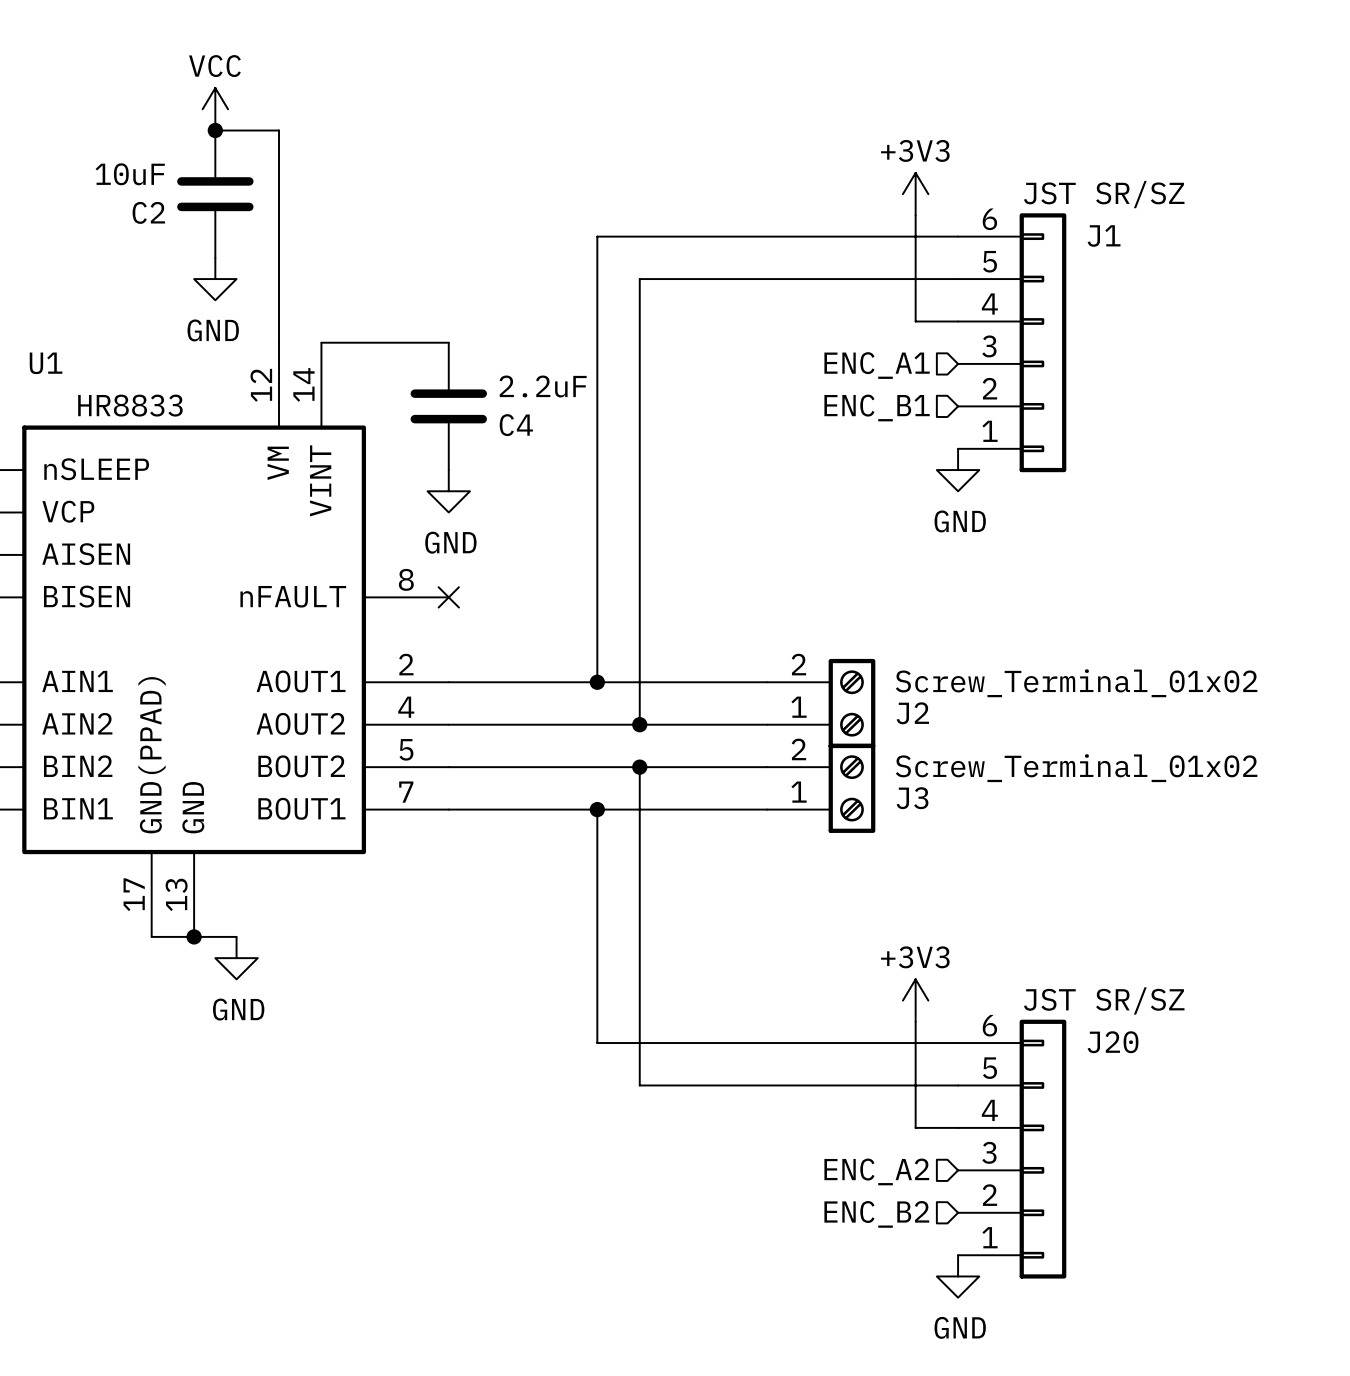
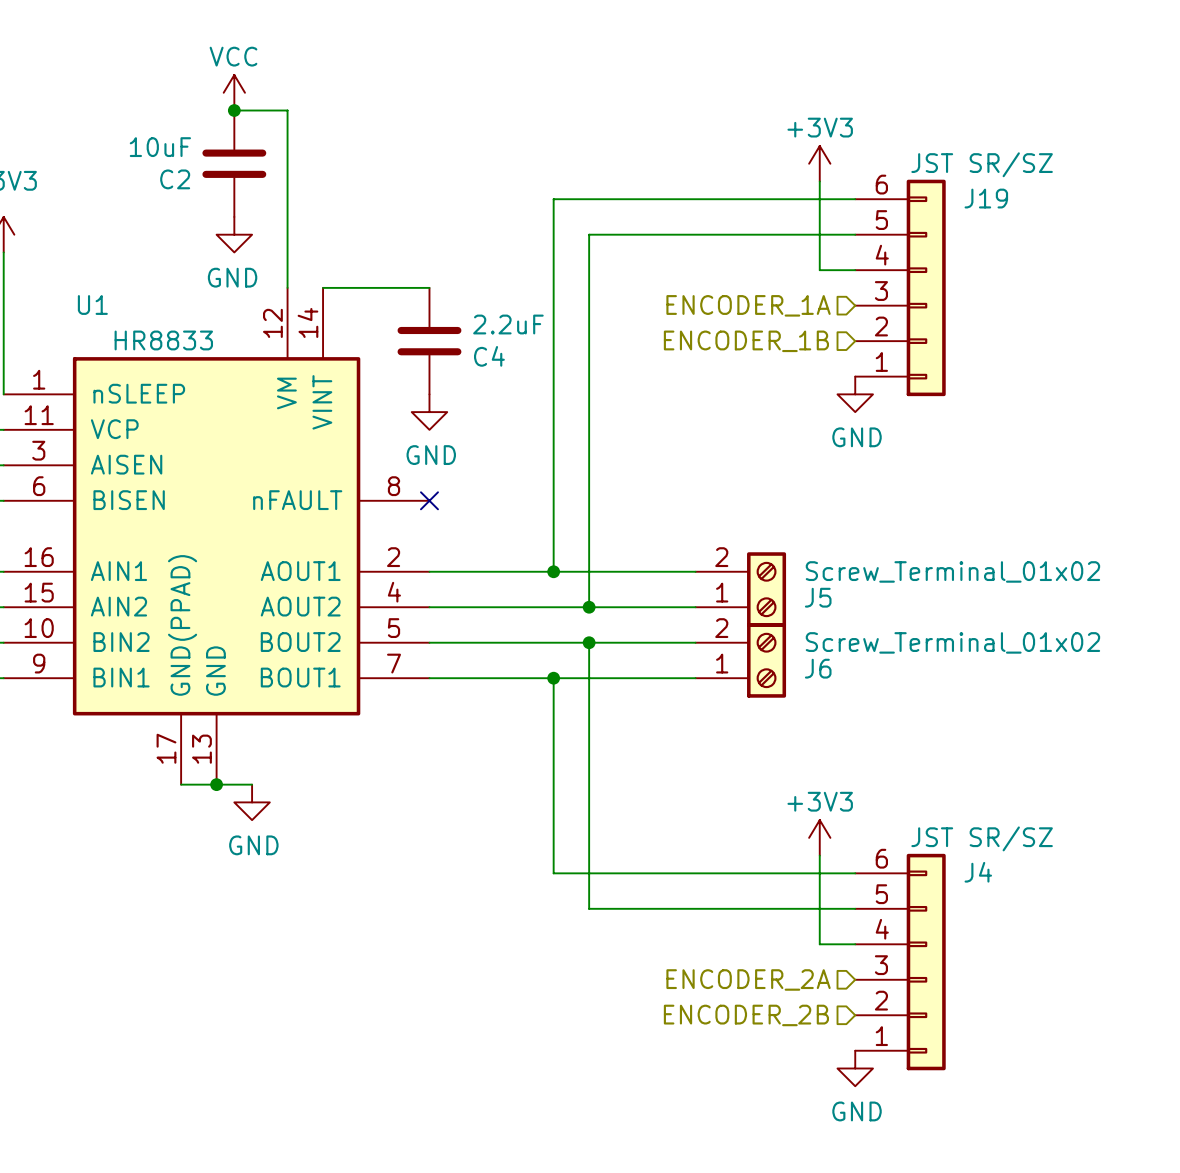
J1 name: J1 (1104, 236) -> J19 (986, 198)
hierarchical label: ENC_A1 (877, 365) -> ENCODER_1A (748, 305)
hierarchical label: ENC_B1 (877, 407) -> ENCODER_1B (746, 341)
J2 name: J2 (912, 713) -> J5 (818, 597)
J3 name: J3 (912, 798) -> J6 (818, 668)
J20 name: J20 (1113, 1042) -> J4 (978, 872)
hierarchical label: ENC_A2 (876, 1171) -> ENCODER_2A (748, 979)
hierarchical label: ENC_B2 (876, 1214) -> ENCODER_2B (746, 1015)

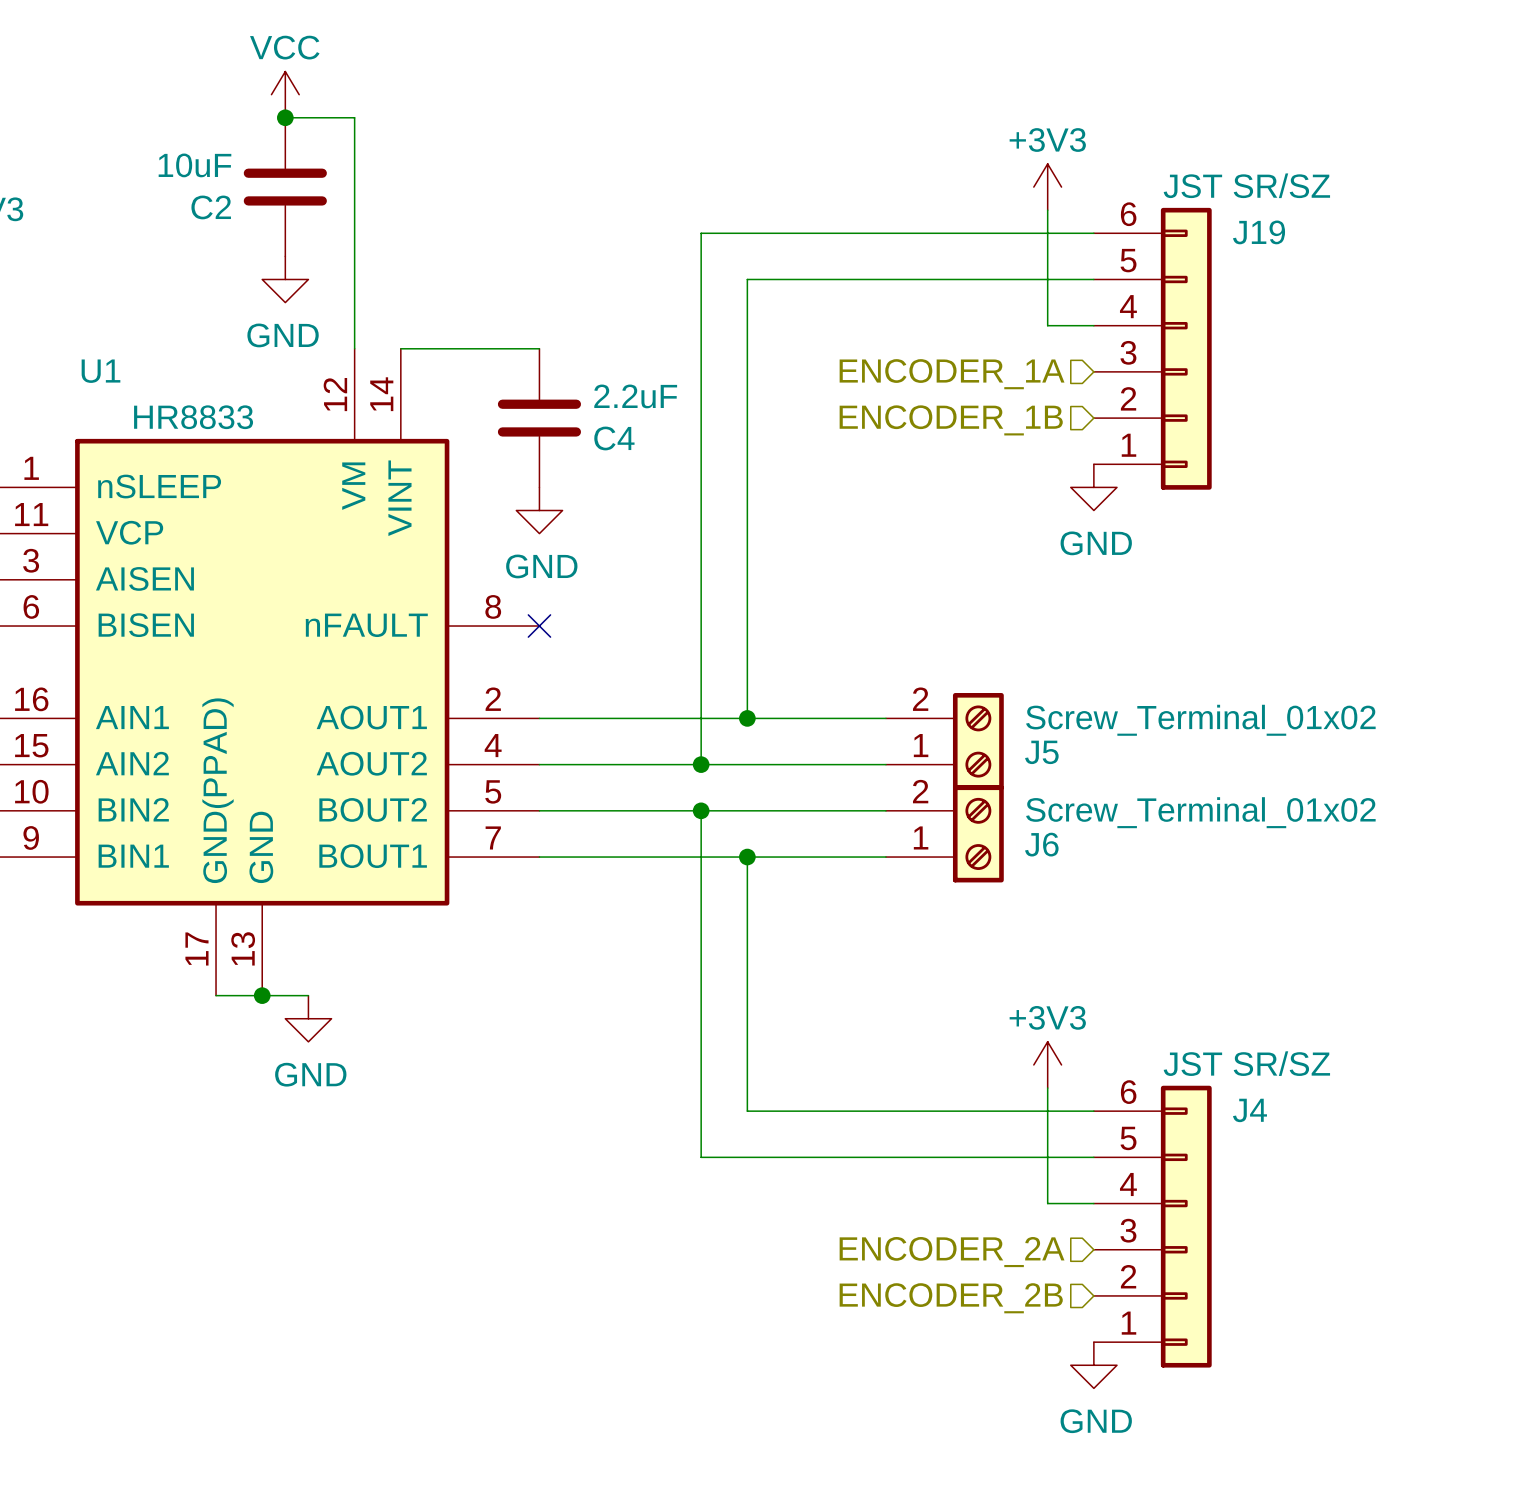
junction: (553, 571) -> none
wire: (589, 571) (589, 607) -> (701, 718) (701, 764)
junction: none -> (747, 718)
junction: none -> (701, 764)
junction: (589, 607) -> none
junction: none -> (701, 810)
wire: (589, 642) (589, 678) -> (701, 810) (701, 857)
junction: (589, 642) -> none
junction: (553, 678) -> none
junction: none -> (747, 857)
wire: (553, 873) (589, 873) (589, 908) -> (701, 1111) (701, 1157) (747, 1157)

